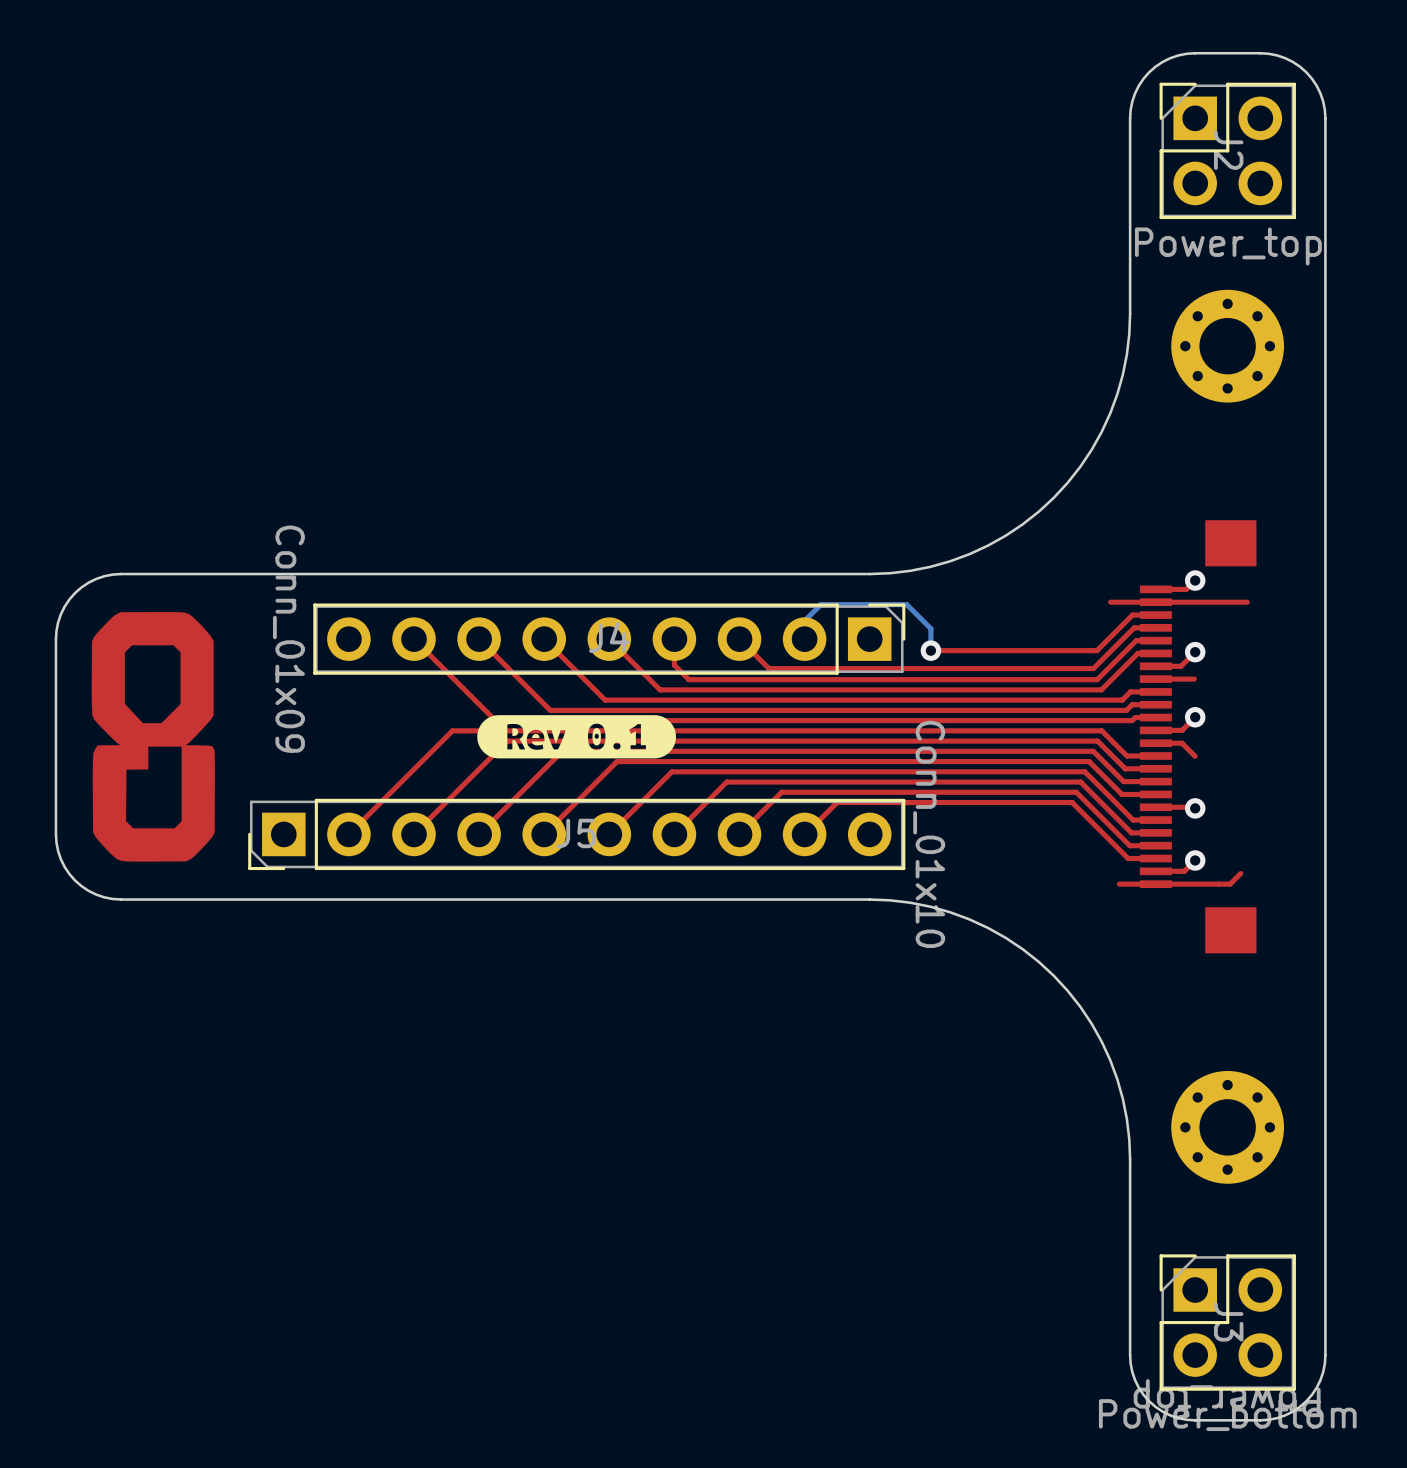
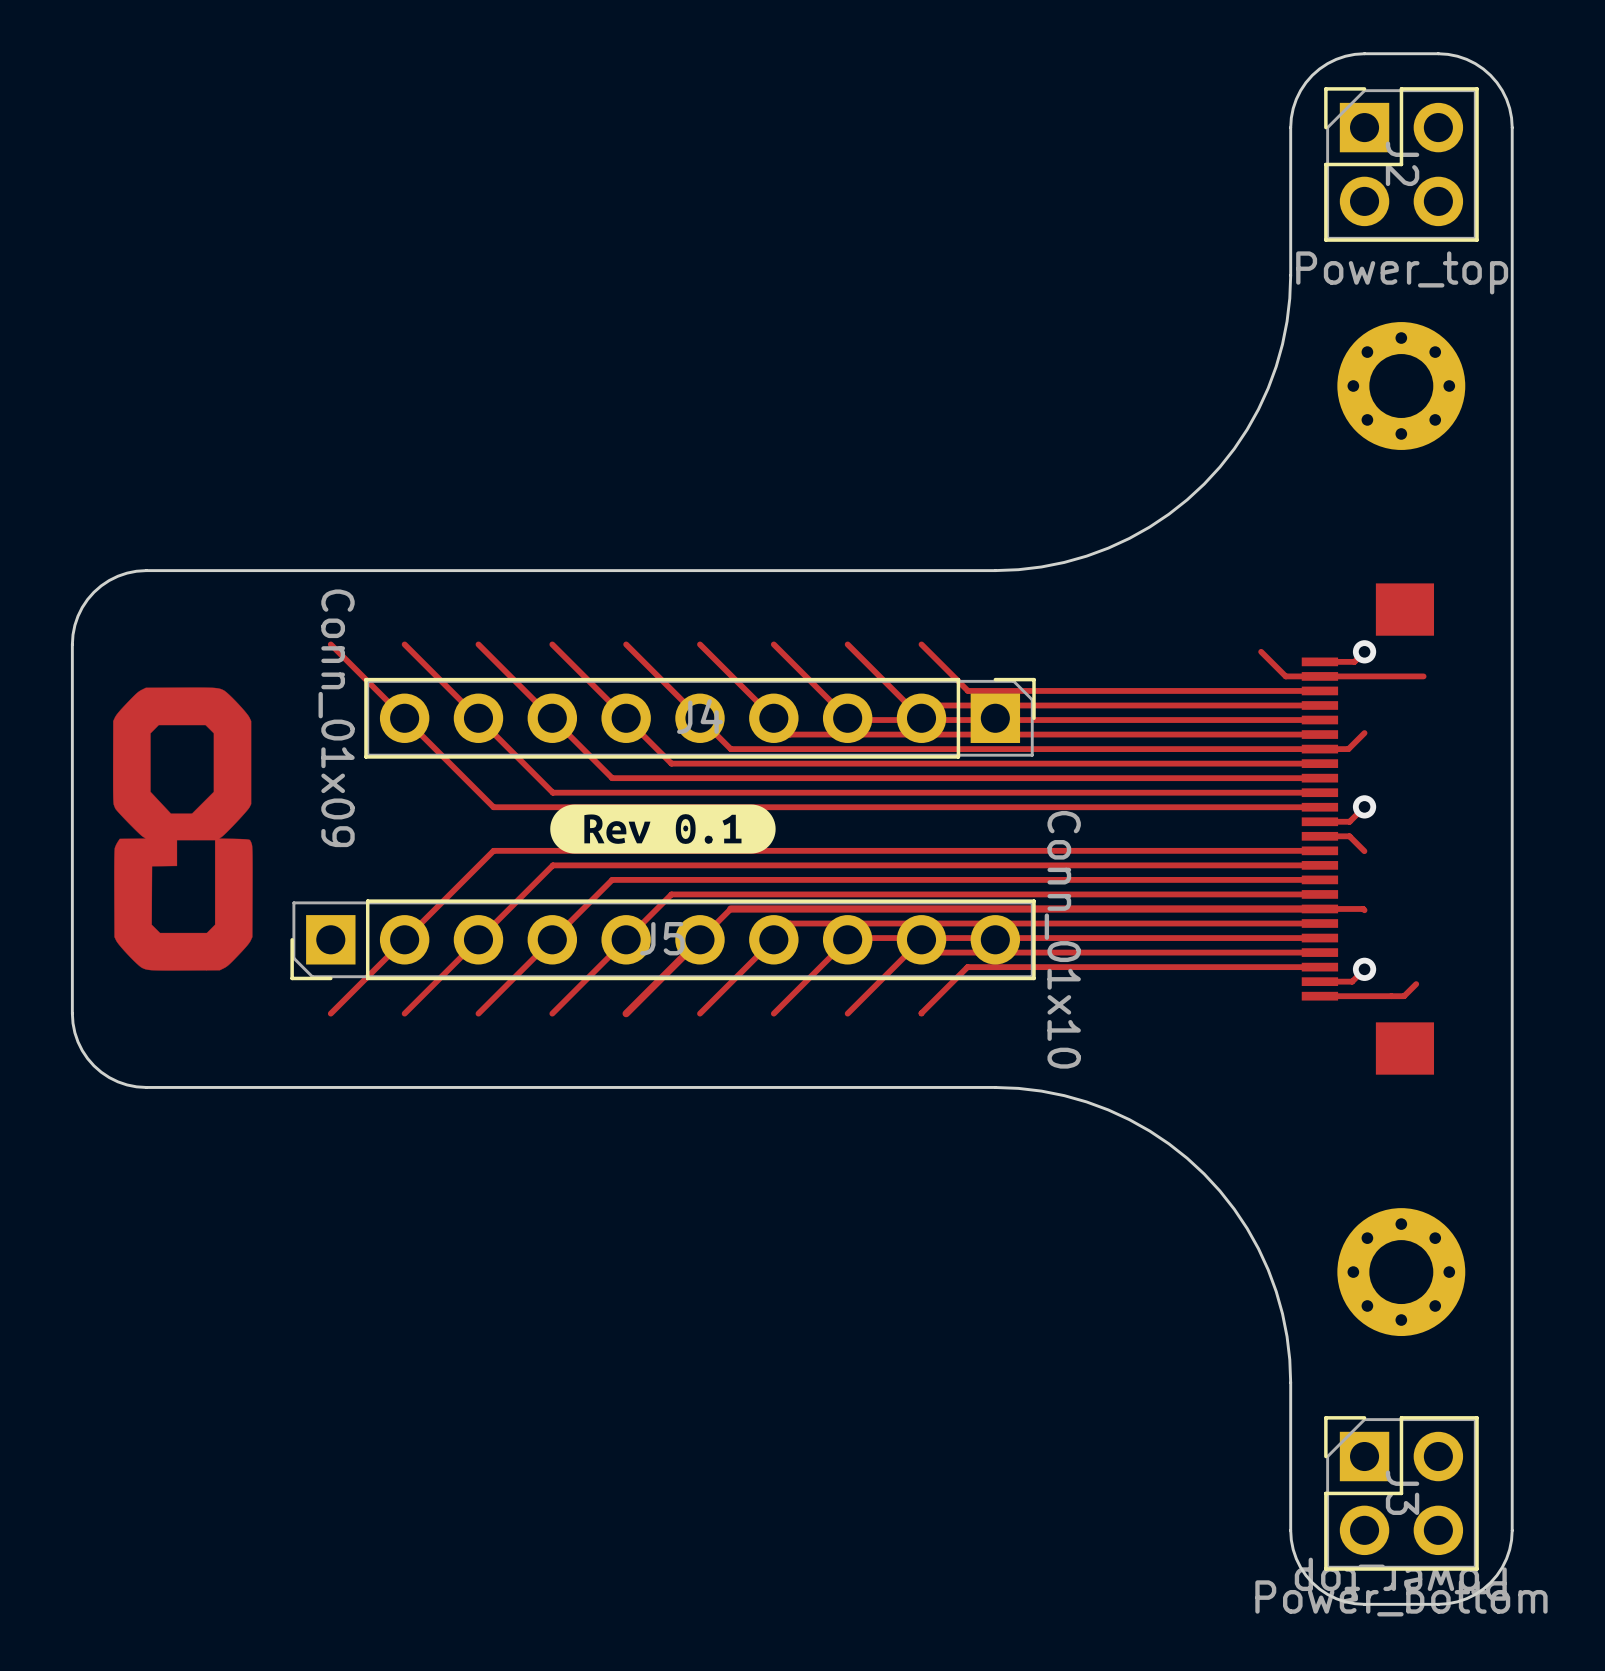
board edge: (1130, 248) (1130, 313) (1126, 354) (1122, 374) (1110, 413) (1091, 449) (1080, 466) (1053, 497) (1022, 524) (987, 545) (950, 561) (910, 570) (869, 574) (112, 574) (88, 582) (69, 599) (58, 622) (55, 639) -> (1290, 275) (1287, 321) (1276, 366) (1258, 409) (1234, 448) (1204, 484) (1168, 514) (1129, 538) (1086, 556) (1041, 566) (995, 570) (136, 571) (117, 576) (101, 585) (87, 599) (77, 616) (72, 644) (72, 718)
top track: none -> (330, 644) (493, 807) (1296, 807)
top track: none -> (404, 644) (478, 718)
top track: none -> (478, 644) (552, 718)
top track: none -> (552, 644) (626, 718)
top track: none -> (626, 644) (699, 718)
top track: none -> (699, 644) (790, 734) (1299, 734)
top track: none -> (773, 644) (847, 718)
top track: none -> (847, 644) (908, 705) (1295, 705)
top track: (1125, 602) (1110, 602) -> (1285, 676) (1261, 651)
top track: (1132, 615) (1096, 650) (930, 650) -> (1293, 690) (968, 690) (921, 644)
top track: (1134, 627) (1093, 668) (768, 668) (741, 640) -> (1297, 720) (849, 720)
top track: (674, 639) (674, 665) (688, 679) (1097, 679) (1136, 640) -> none
bottom track: (804, 639) (804, 620) (820, 604) (906, 604) (930, 628) (930, 650) -> none
via: (930, 650) -> none
via: (1195, 652) -> none
top track: (1137, 653) (1101, 689) (660, 689) (636, 666) -> (1319, 749) (730, 749)
top track: (584, 679) (605, 700) (1122, 700) (1130, 691) -> (671, 763) (1319, 763)
top track: (1194, 679) (1155, 679) -> none
top track: (531, 691) (550, 710) (1126, 710) (1132, 704) -> (612, 778) (1291, 778)
top track: (479, 704) (495, 720) (1132, 720) (1135, 717) -> (552, 792) (1293, 792)
top track: (1127, 756) (1101, 730) (452, 730) (427, 756) -> (1287, 850) (493, 850)
top track: (1125, 768) (1097, 741) (507, 741) (479, 768) -> (1285, 865) (552, 865)
top track: (1123, 781) (1093, 751) (562, 751) (531, 781) -> (1283, 879) (612, 879)
top track: (1122, 794) (1089, 761) (617, 761) (584, 794) -> (1281, 894) (671, 894)
top track: (636, 807) (671, 771) (1084, 771) (1133, 820) -> (730, 908) (1319, 908)
via: (1195, 808) -> none
top track: (688, 820) (726, 782) (1080, 782) (1131, 832) -> (790, 923) (1294, 923)
top track: (741, 832) (781, 792) (1076, 792) (1129, 845) -> (849, 938) (1292, 938)
board edge: (55, 834) (60, 859) (69, 874) (88, 890) (112, 898) (869, 899) (910, 902) (950, 912) (987, 927) (1022, 949) (1053, 975) (1067, 990) (1091, 1023) (1110, 1060) (1122, 1099) (1126, 1119) (1130, 1159) (1130, 1225) -> (72, 939) (72, 1013) (77, 1041) (87, 1058) (101, 1072) (117, 1081) (136, 1086) (995, 1087) (1041, 1091) (1086, 1101) (1129, 1119) (1168, 1143) (1204, 1173) (1234, 1209) (1258, 1248) (1276, 1291) (1287, 1336) (1290, 1382)
top track: none -> (404, 939) (330, 1013)
top track: none -> (478, 939) (404, 1013)
top track: none -> (552, 939) (478, 1013)
top track: none -> (626, 939) (552, 1013)
top track: none -> (699, 939) (626, 1013)
top track: none -> (773, 939) (699, 1013)
top track: none -> (847, 939) (773, 1013)
top track: (804, 834) (837, 802) (1072, 802) (1128, 858) -> (921, 1013) (967, 967) (1288, 967)
top track: none -> (1290, 952) (908, 952) (847, 1013)
top track: (1155, 884) (1119, 884) -> none

